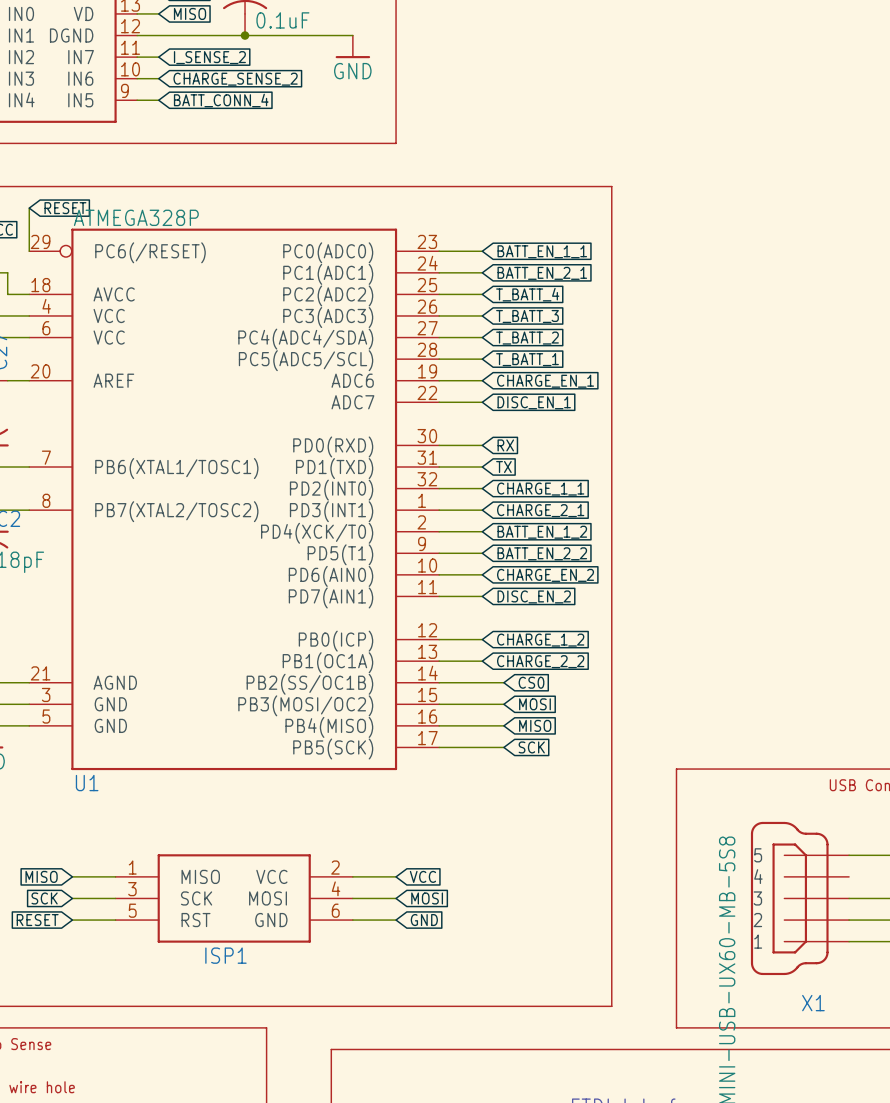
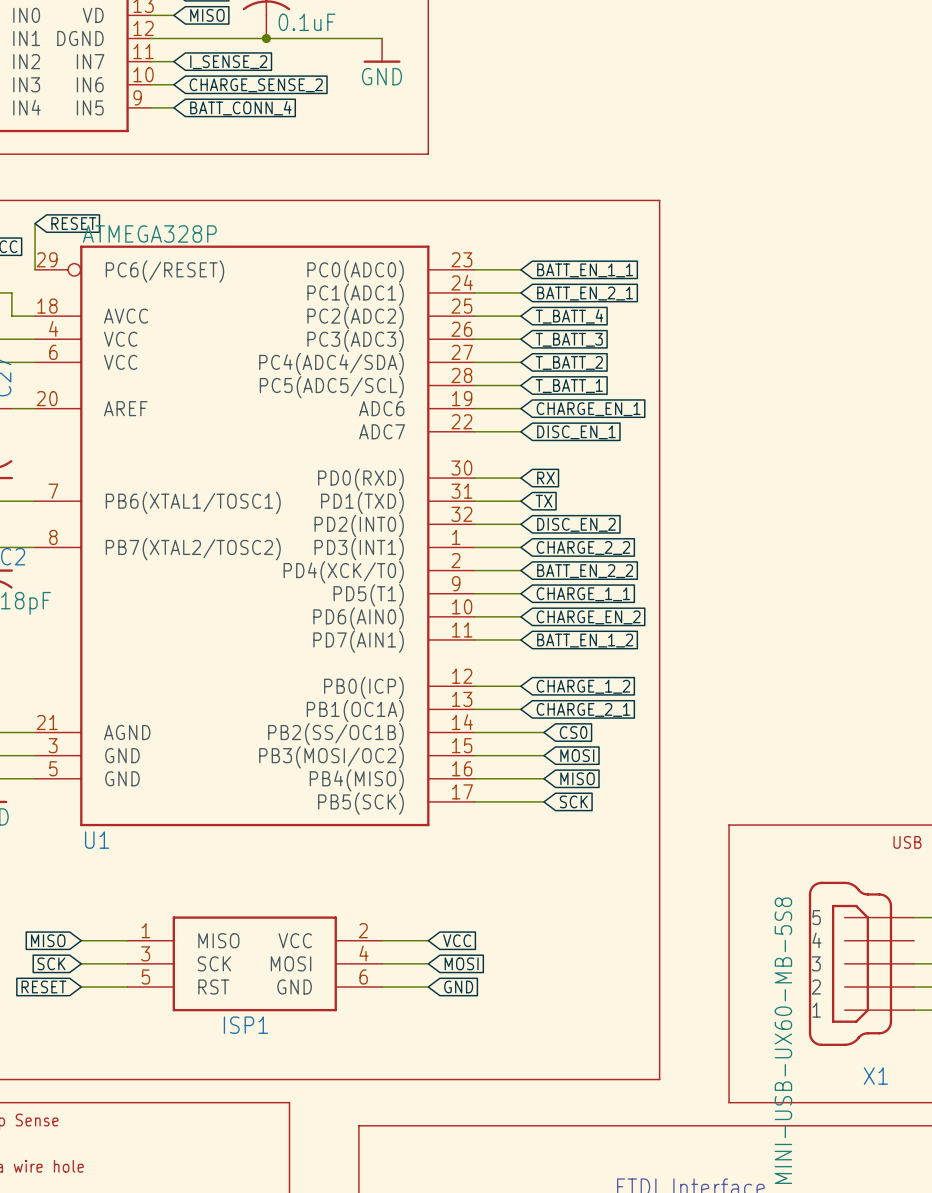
global label: CHARGE_1_1 (540, 489) -> DISC_EN_2 (576, 524)
global label: CHARGE_2_1 (540, 510) -> CHARGE_2_2 (583, 548)
global label: BATT_EN_1_2 (542, 532) -> BATT_EN_2_2 (585, 571)
global label: BATT_EN_2_2 (542, 553) -> CHARGE_1_1 (583, 594)
global label: DISC_EN_2 (534, 596) -> BATT_EN_1_2 (585, 640)
global label: CHARGE_2_2 (540, 661) -> CHARGE_2_1 (583, 709)

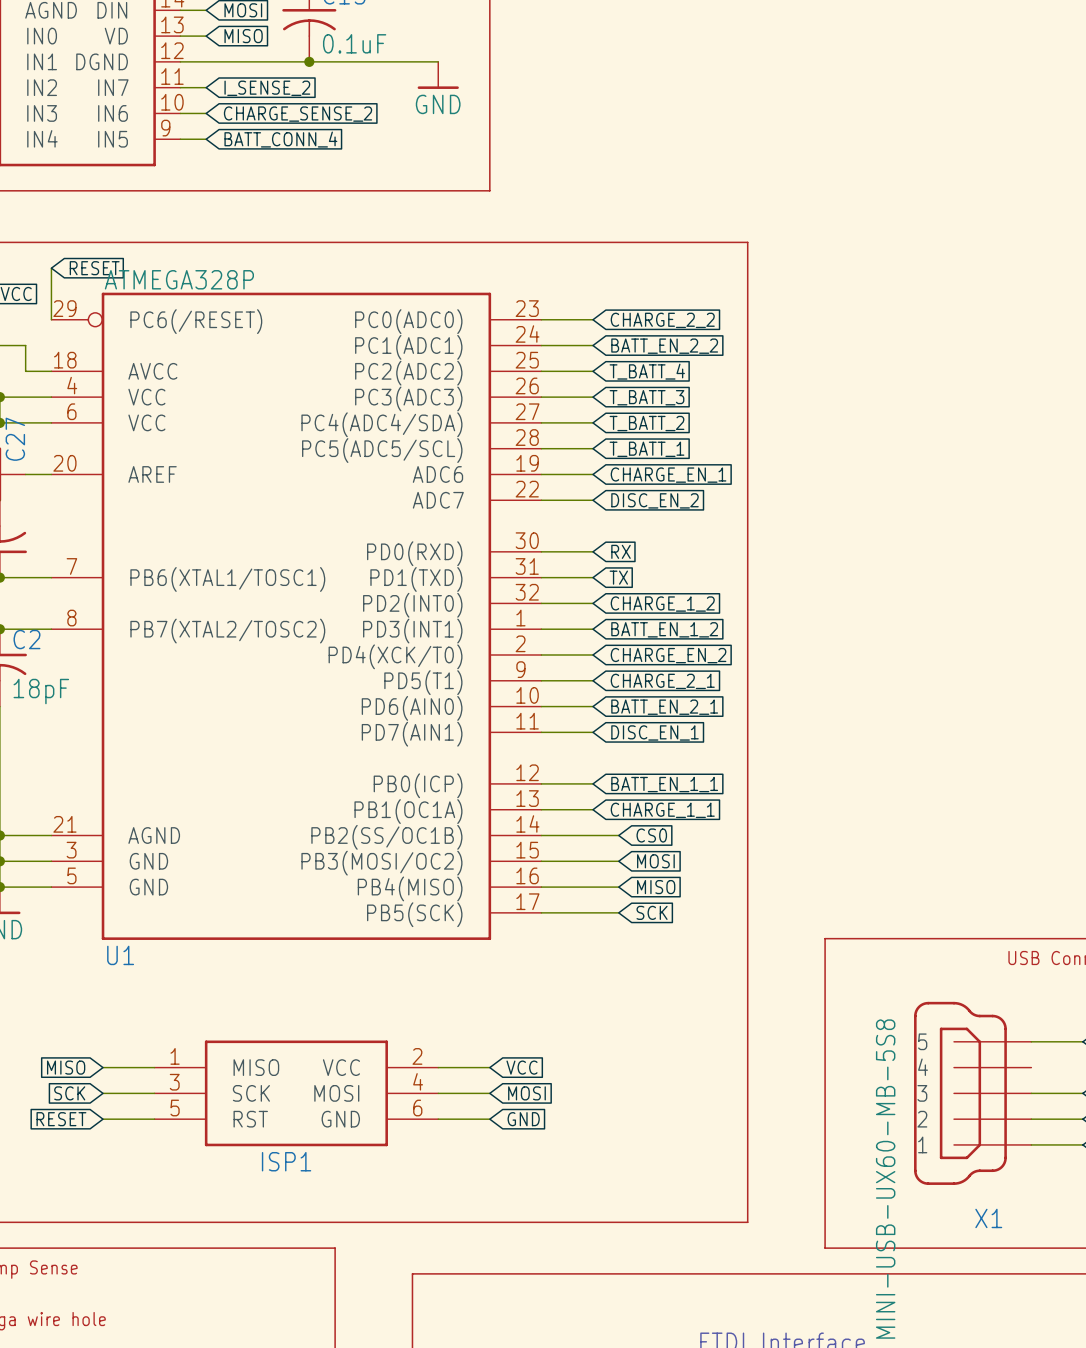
global label: BATT_EN_1_1 (585, 270) -> CHARGE_2_2 (662, 320)
global label: BATT_EN_2_1 (585, 293) -> BATT_EN_2_2 (664, 346)
global label: DISC_EN_1 (576, 432) -> DISC_EN_2 (655, 500)
global label: DISC_EN_2 (576, 524) -> CHARGE_1_2 (662, 604)
global label: CHARGE_2_2 (583, 548) -> BATT_EN_1_2 (664, 629)
global label: BATT_EN_2_2 (585, 571) -> CHARGE_EN_2 (668, 655)
global label: CHARGE_1_1 (583, 594) -> CHARGE_2_1 (662, 681)
global label: CHARGE_EN_2 (588, 617) -> BATT_EN_2_1 (664, 707)
global label: BATT_EN_1_2 (585, 640) -> DISC_EN_1 (655, 732)
global label: CHARGE_1_2 (583, 686) -> BATT_EN_1_1 (664, 784)
global label: CHARGE_2_1 (583, 709) -> CHARGE_1_1 (662, 810)

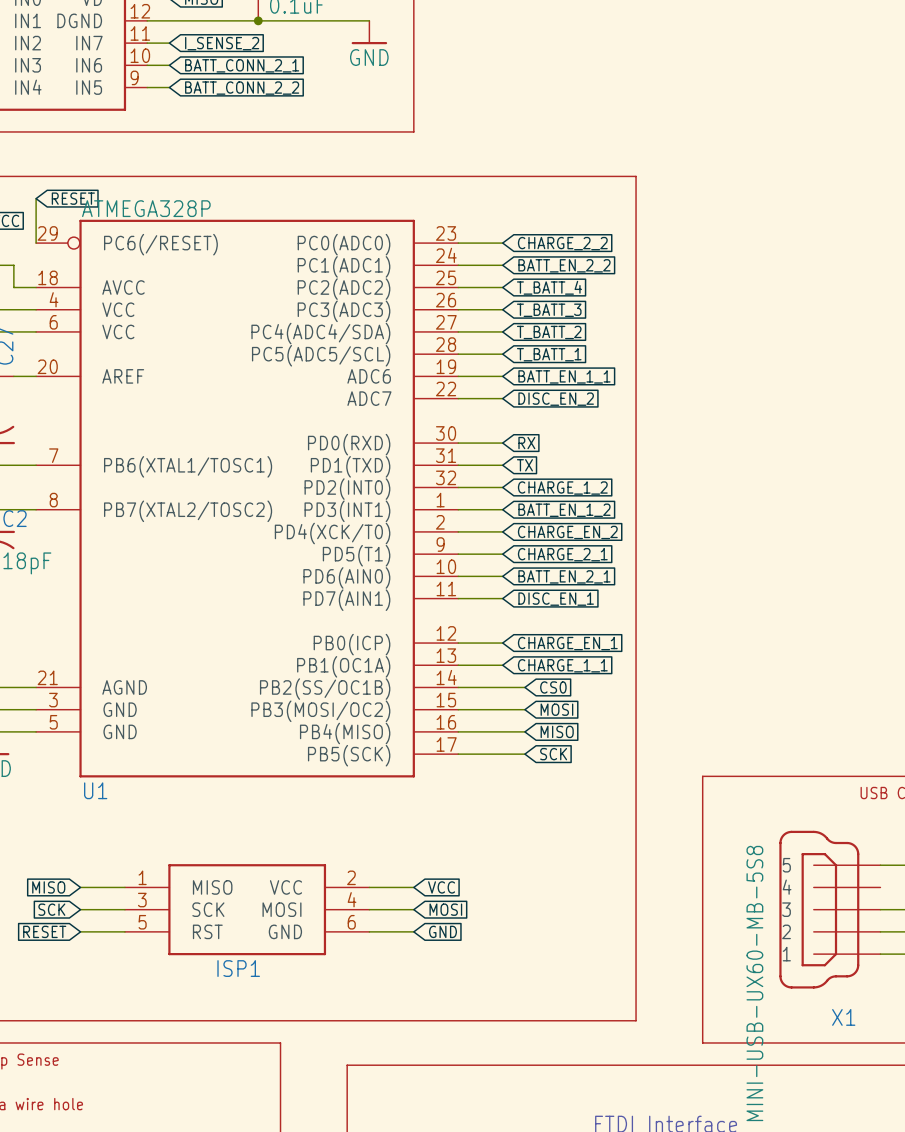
global label: CHARGE_SENSE_2 (298, 114) -> BATT_CONN_2_1 (242, 65)
global label: BATT_CONN_4 (280, 139) -> BATT_CONN_2_2 (242, 88)
global label: CHARGE_EN_1 (668, 475) -> BATT_EN_1_1 (564, 376)
global label: BATT_EN_1_1 (664, 784) -> CHARGE_EN_1 (567, 643)

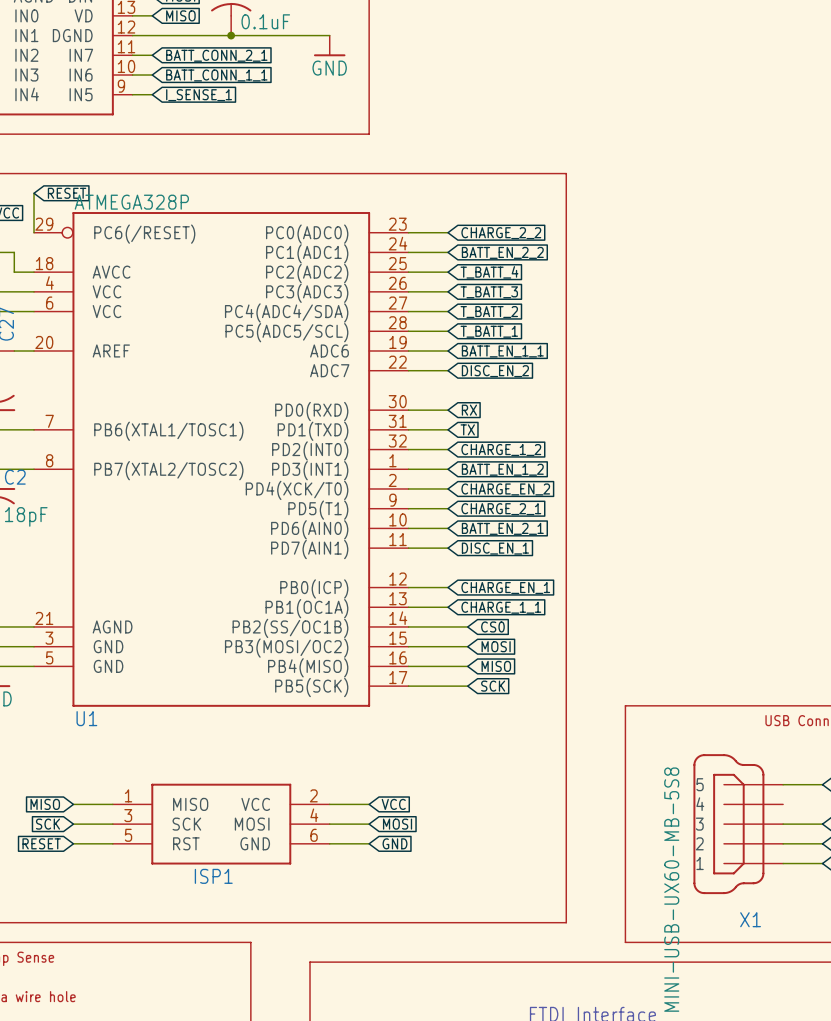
global label: I_SENSE_2 (222, 43) -> BATT_CONN_2_1 (216, 55)
global label: BATT_CONN_2_1 (242, 65) -> BATT_CONN_1_1 (216, 75)
global label: BATT_CONN_2_2 (242, 88) -> I_SENSE_1 (199, 95)

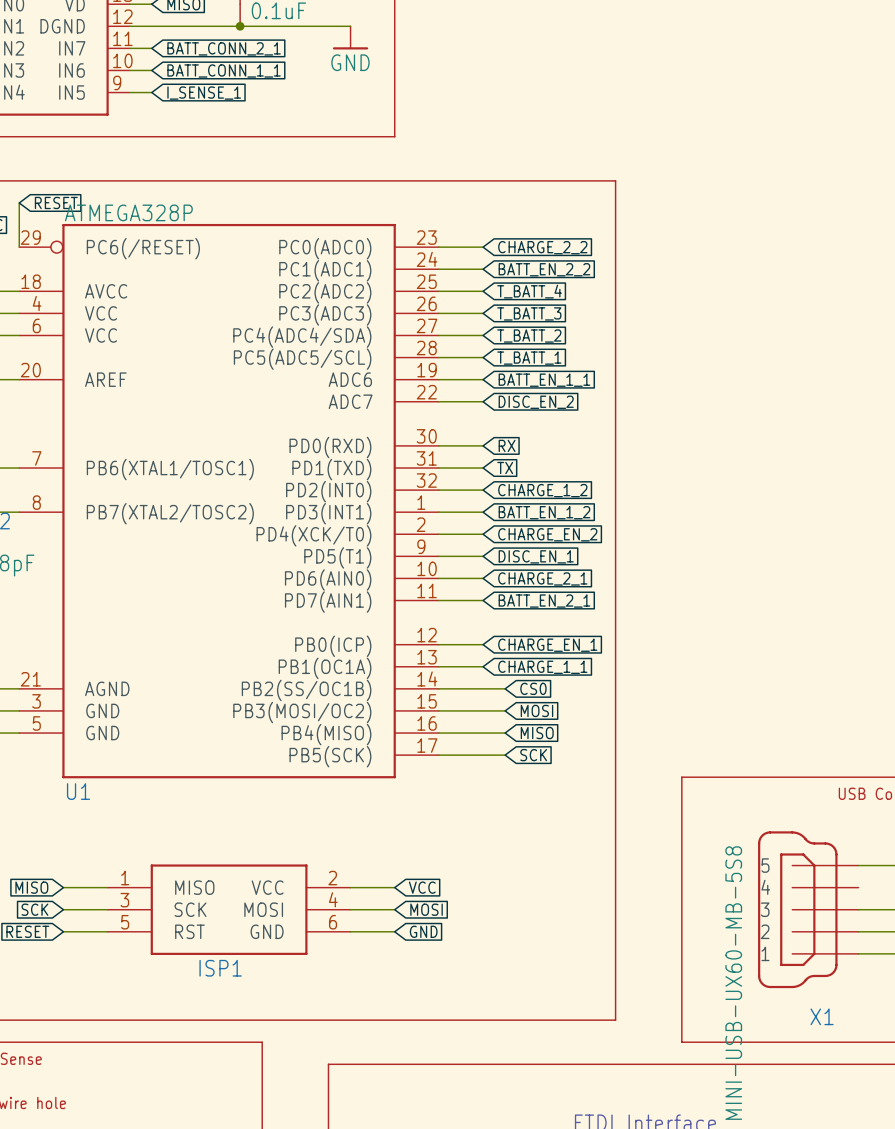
global label: CHARGE_2_1 (501, 509) -> DISC_EN_1 (536, 556)
global label: BATT_EN_2_1 (502, 528) -> CHARGE_2_1 (542, 578)
global label: DISC_EN_1 (495, 548) -> BATT_EN_2_1 (544, 601)

